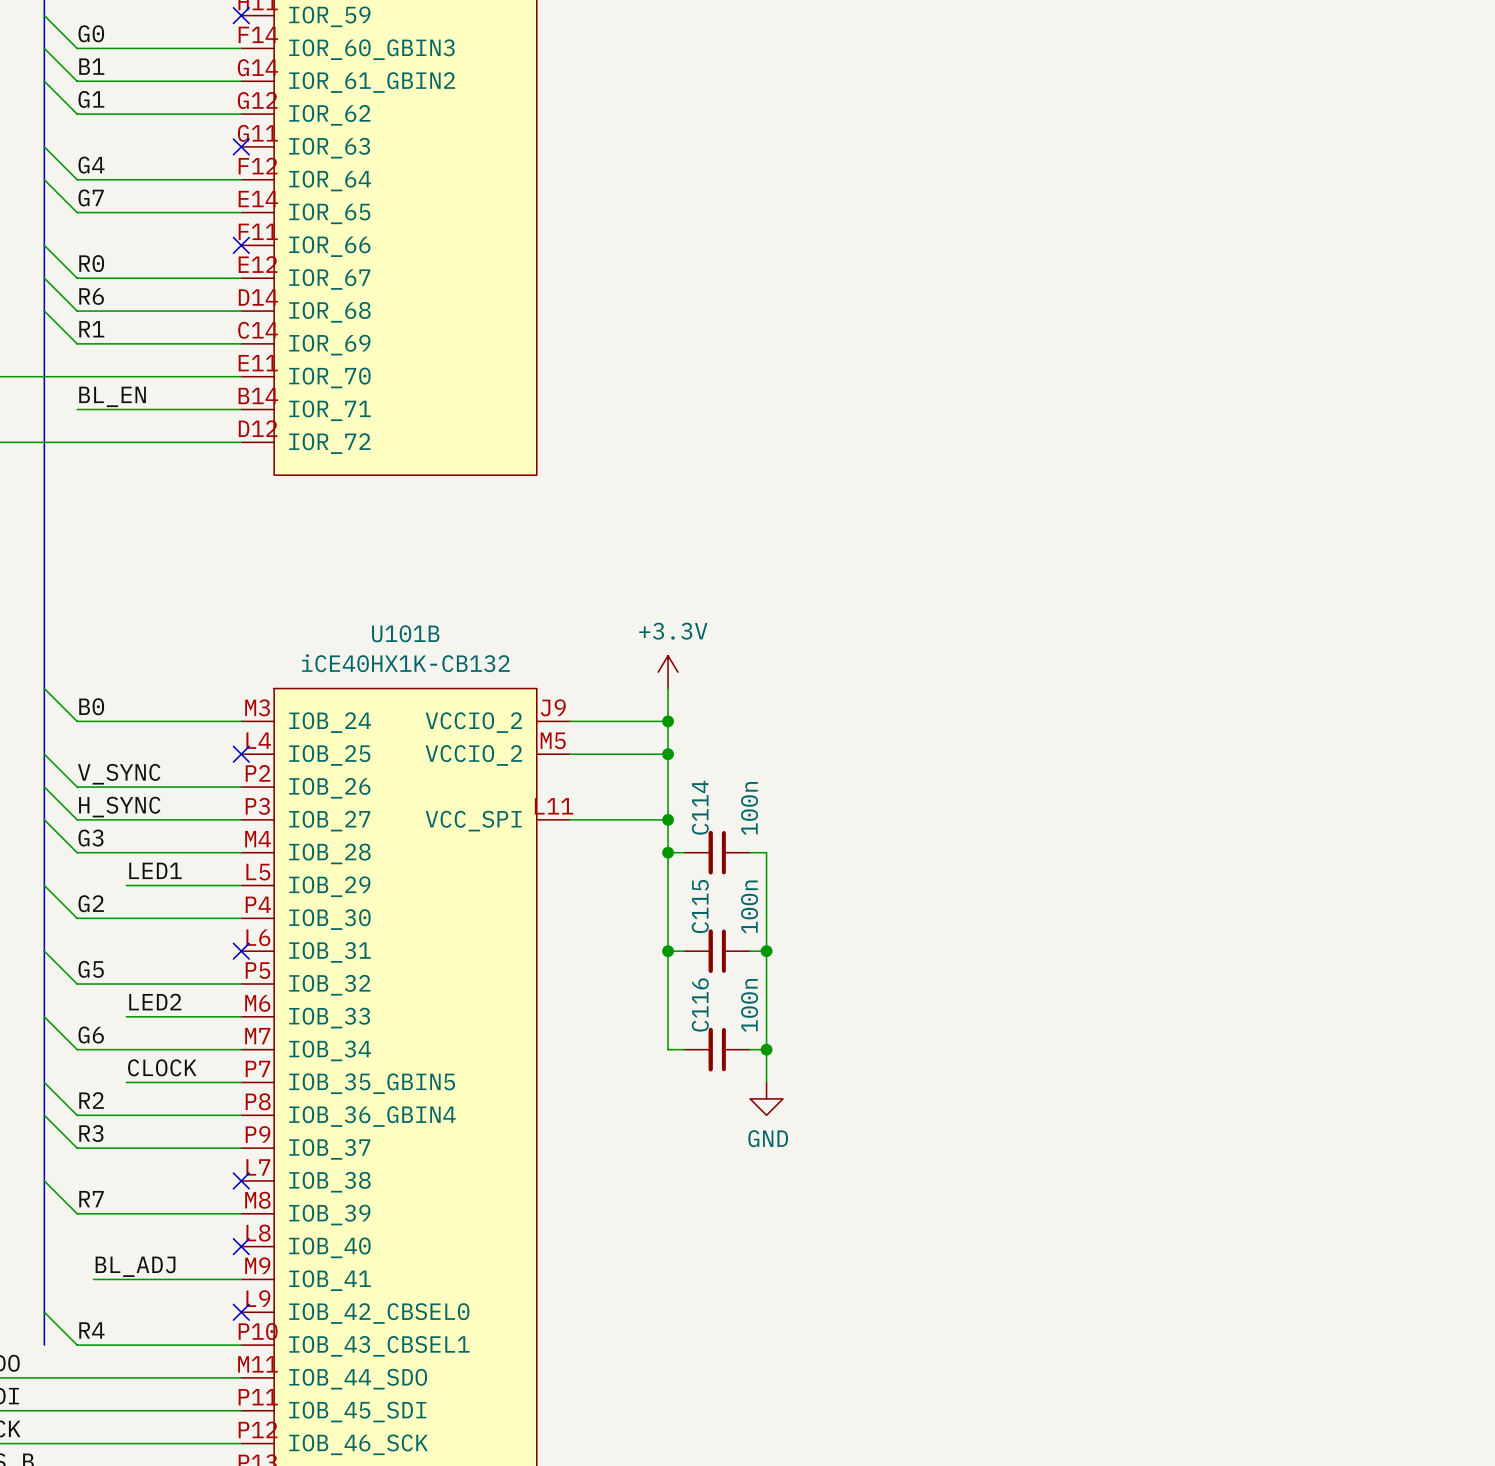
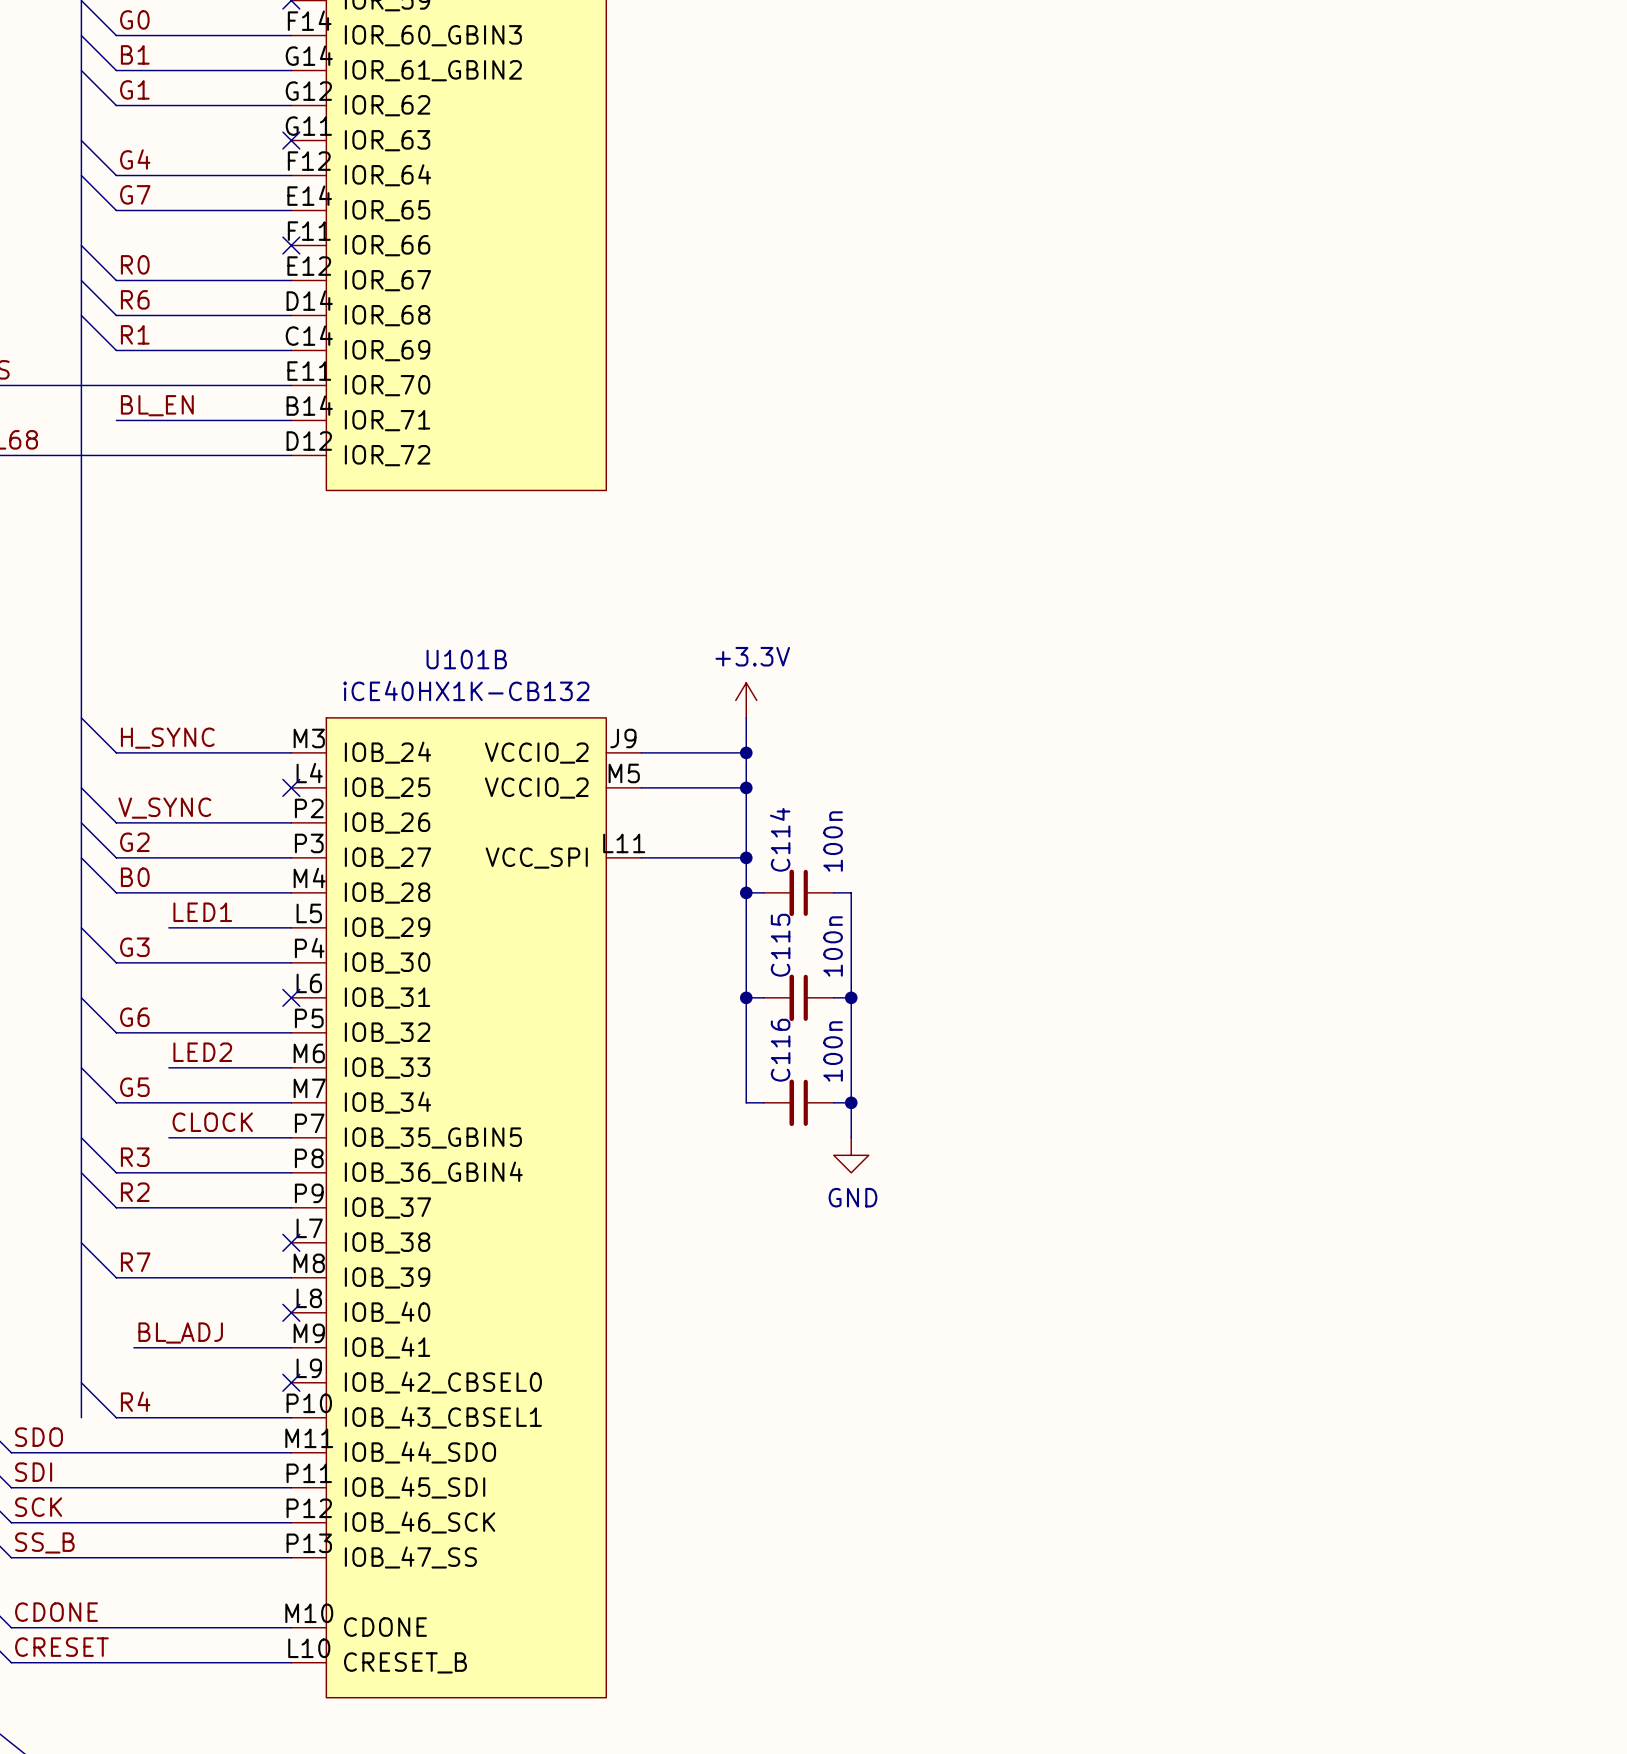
label: B0 (91, 706) -> H_SYNC (167, 738)
label: H_SYNC (119, 807) -> G2 (134, 842)
label: G3 (90, 838) -> B0 (135, 877)
label: G2 (91, 903) -> G3 (134, 947)
label: G5 (91, 969) -> G6 (134, 1017)
label: G6 (91, 1035) -> G5 (134, 1087)
label: R2 (91, 1100) -> R3 (135, 1157)
label: R3 (91, 1133) -> R2 (135, 1192)

